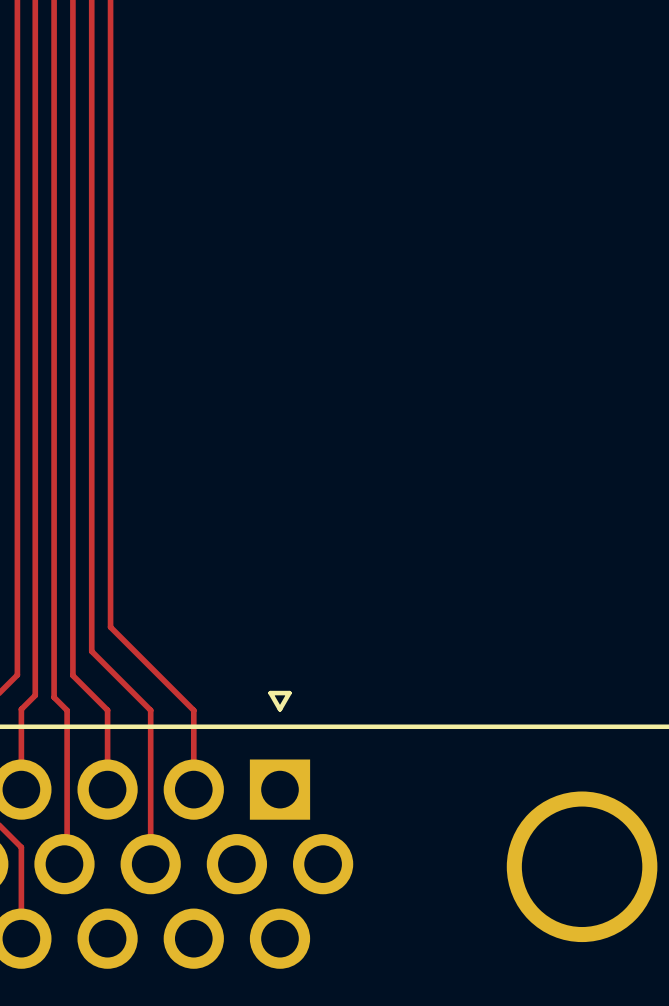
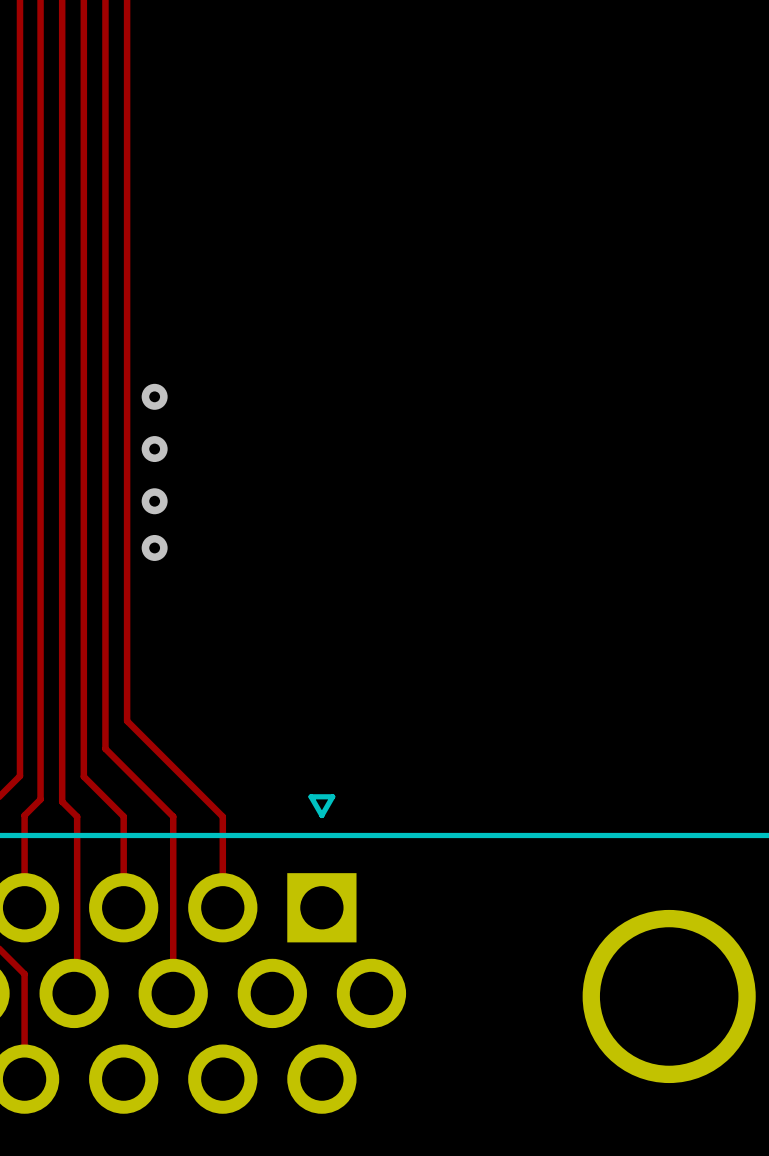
via: none -> (154, 396)
via: none -> (154, 449)
via: none -> (154, 501)
via: none -> (154, 547)

